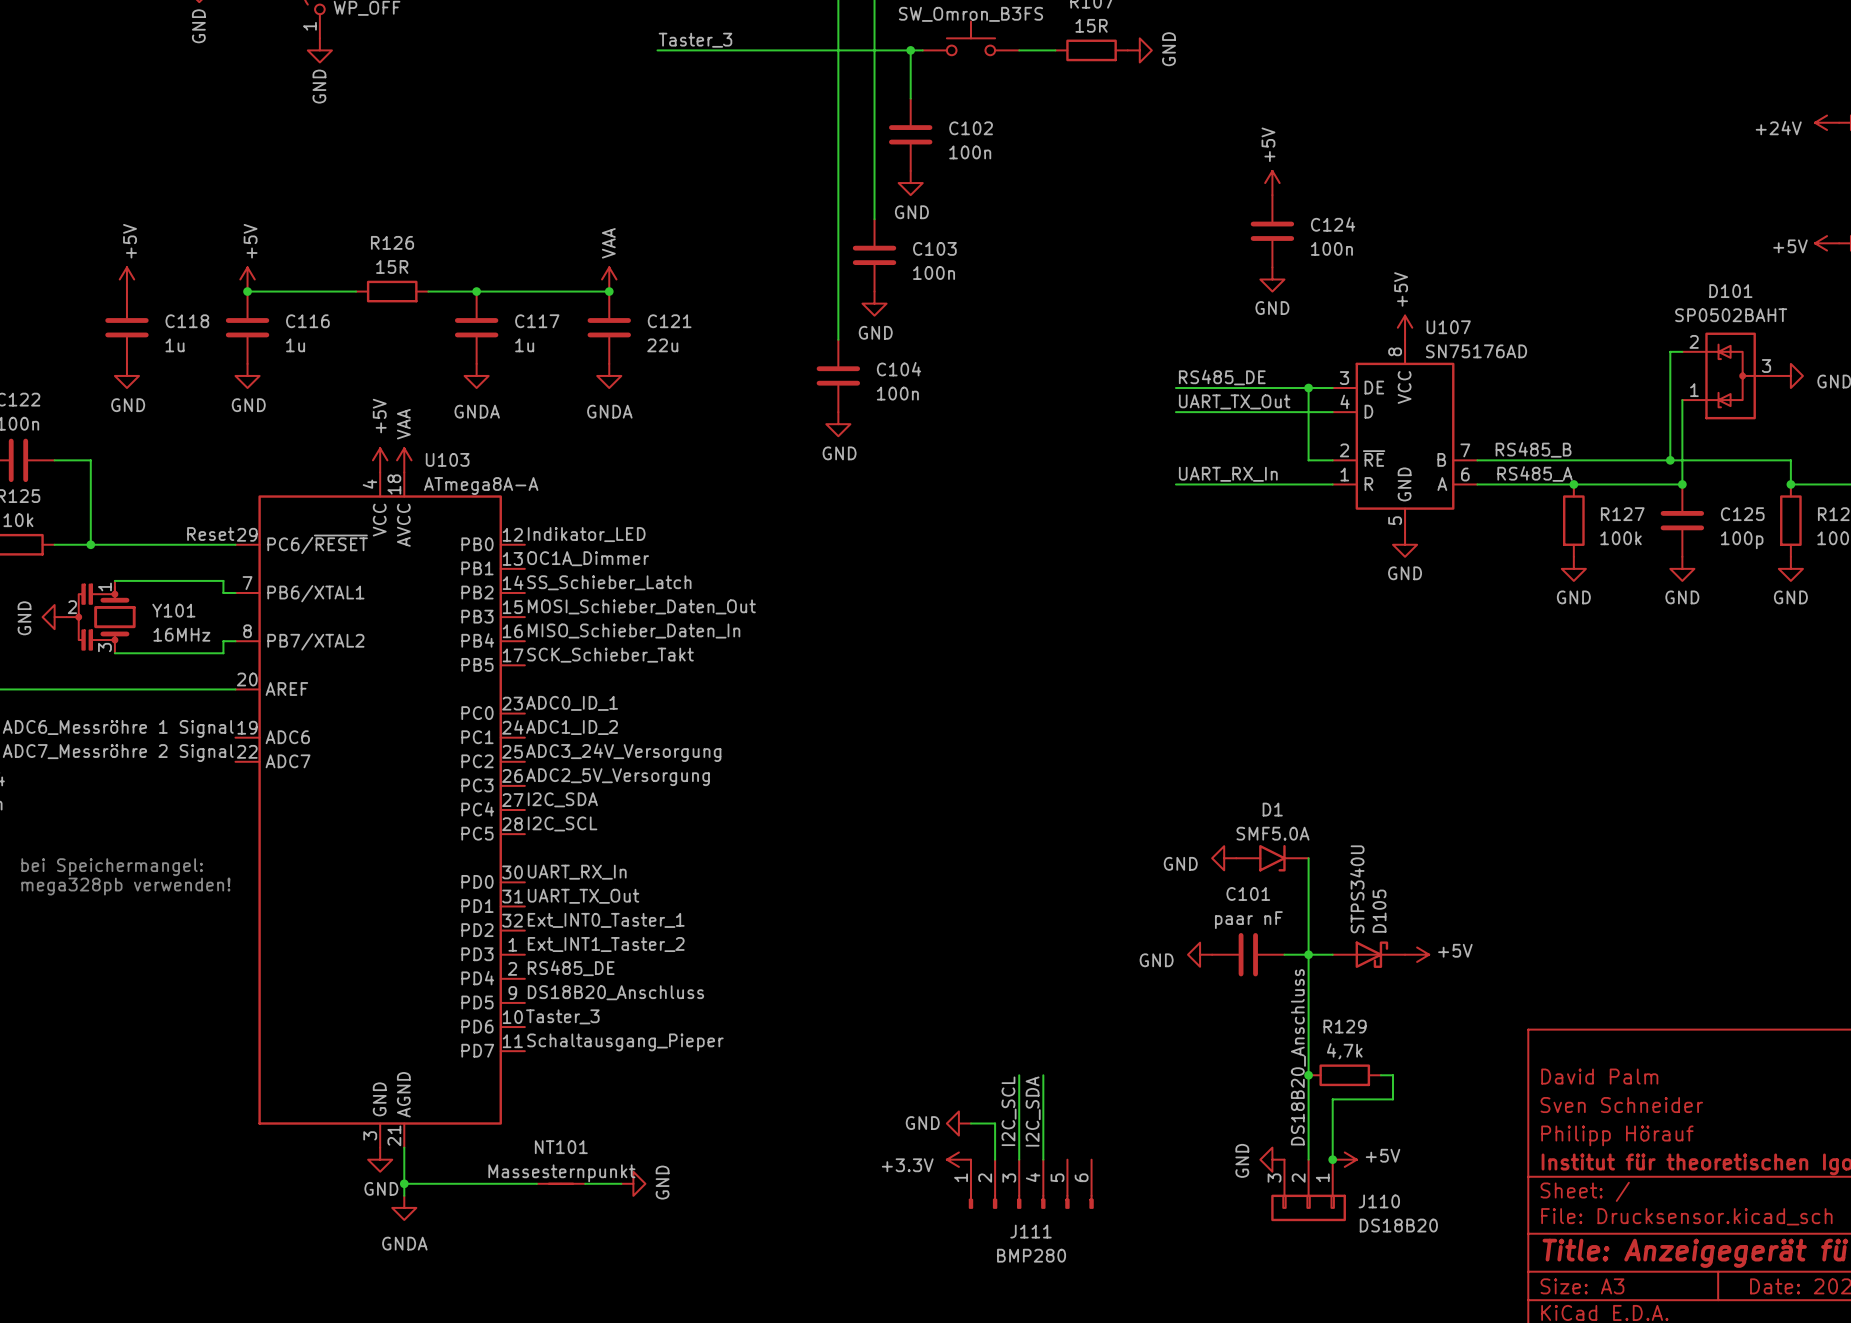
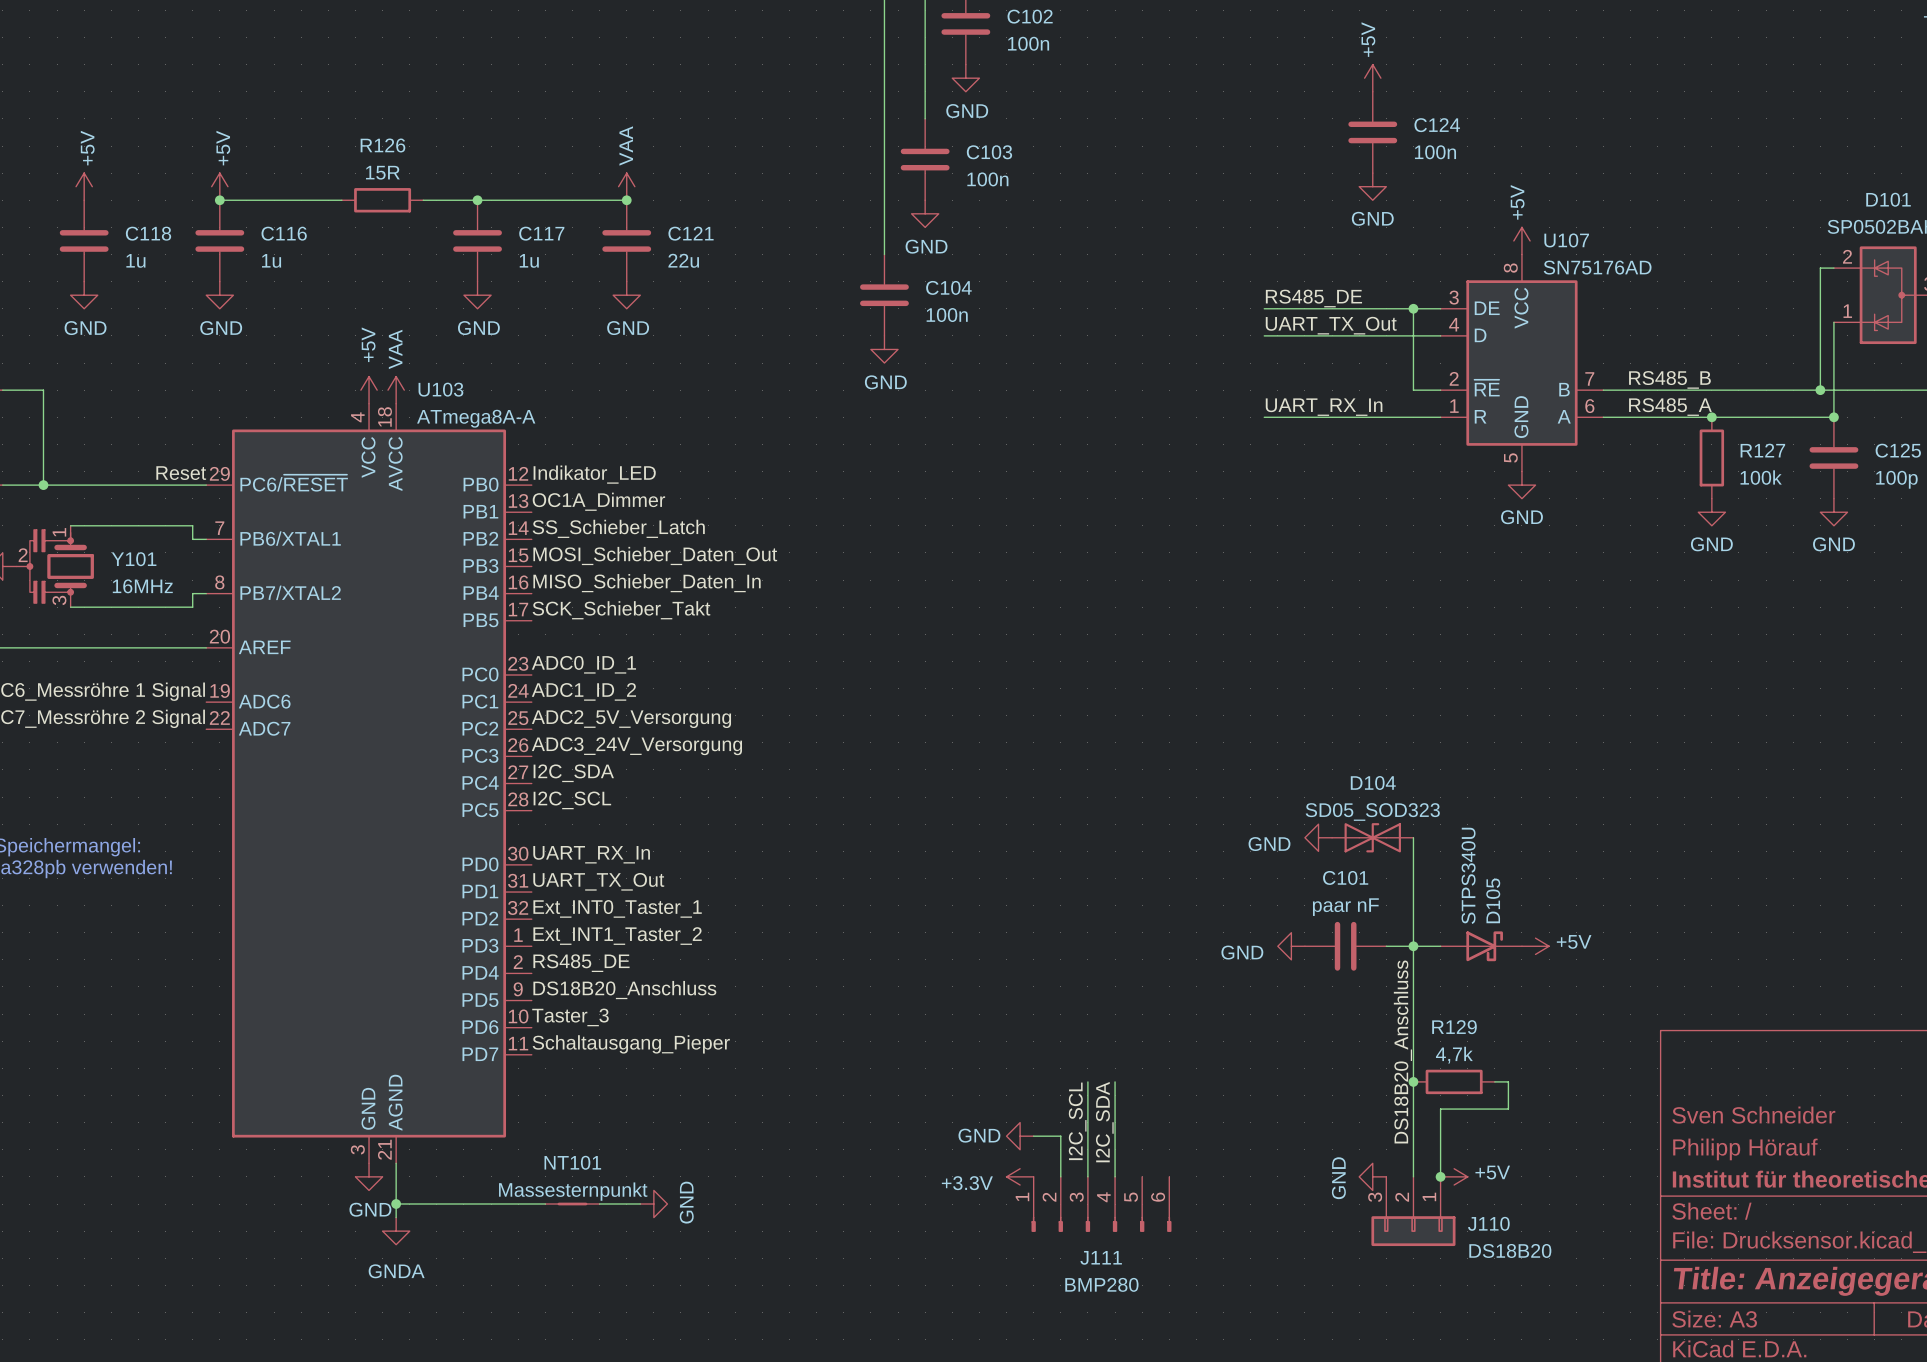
power symbol: GNDA (476, 375) -> GND (477, 295)
power symbol: GNDA (609, 375) -> GND (626, 295)
label: ADC3_24V_Versorgung (623, 752) -> ADC2_5V_Versorgung (631, 719)
label: ADC2_5V_Versorgung (617, 777) -> ADC3_24V_Versorgung (636, 746)
D1: SMF5.0A (1272, 858) -> none
D104: none -> SD05_SOD323 (1372, 837)
title block: David Palm (1599, 1076) -> none

